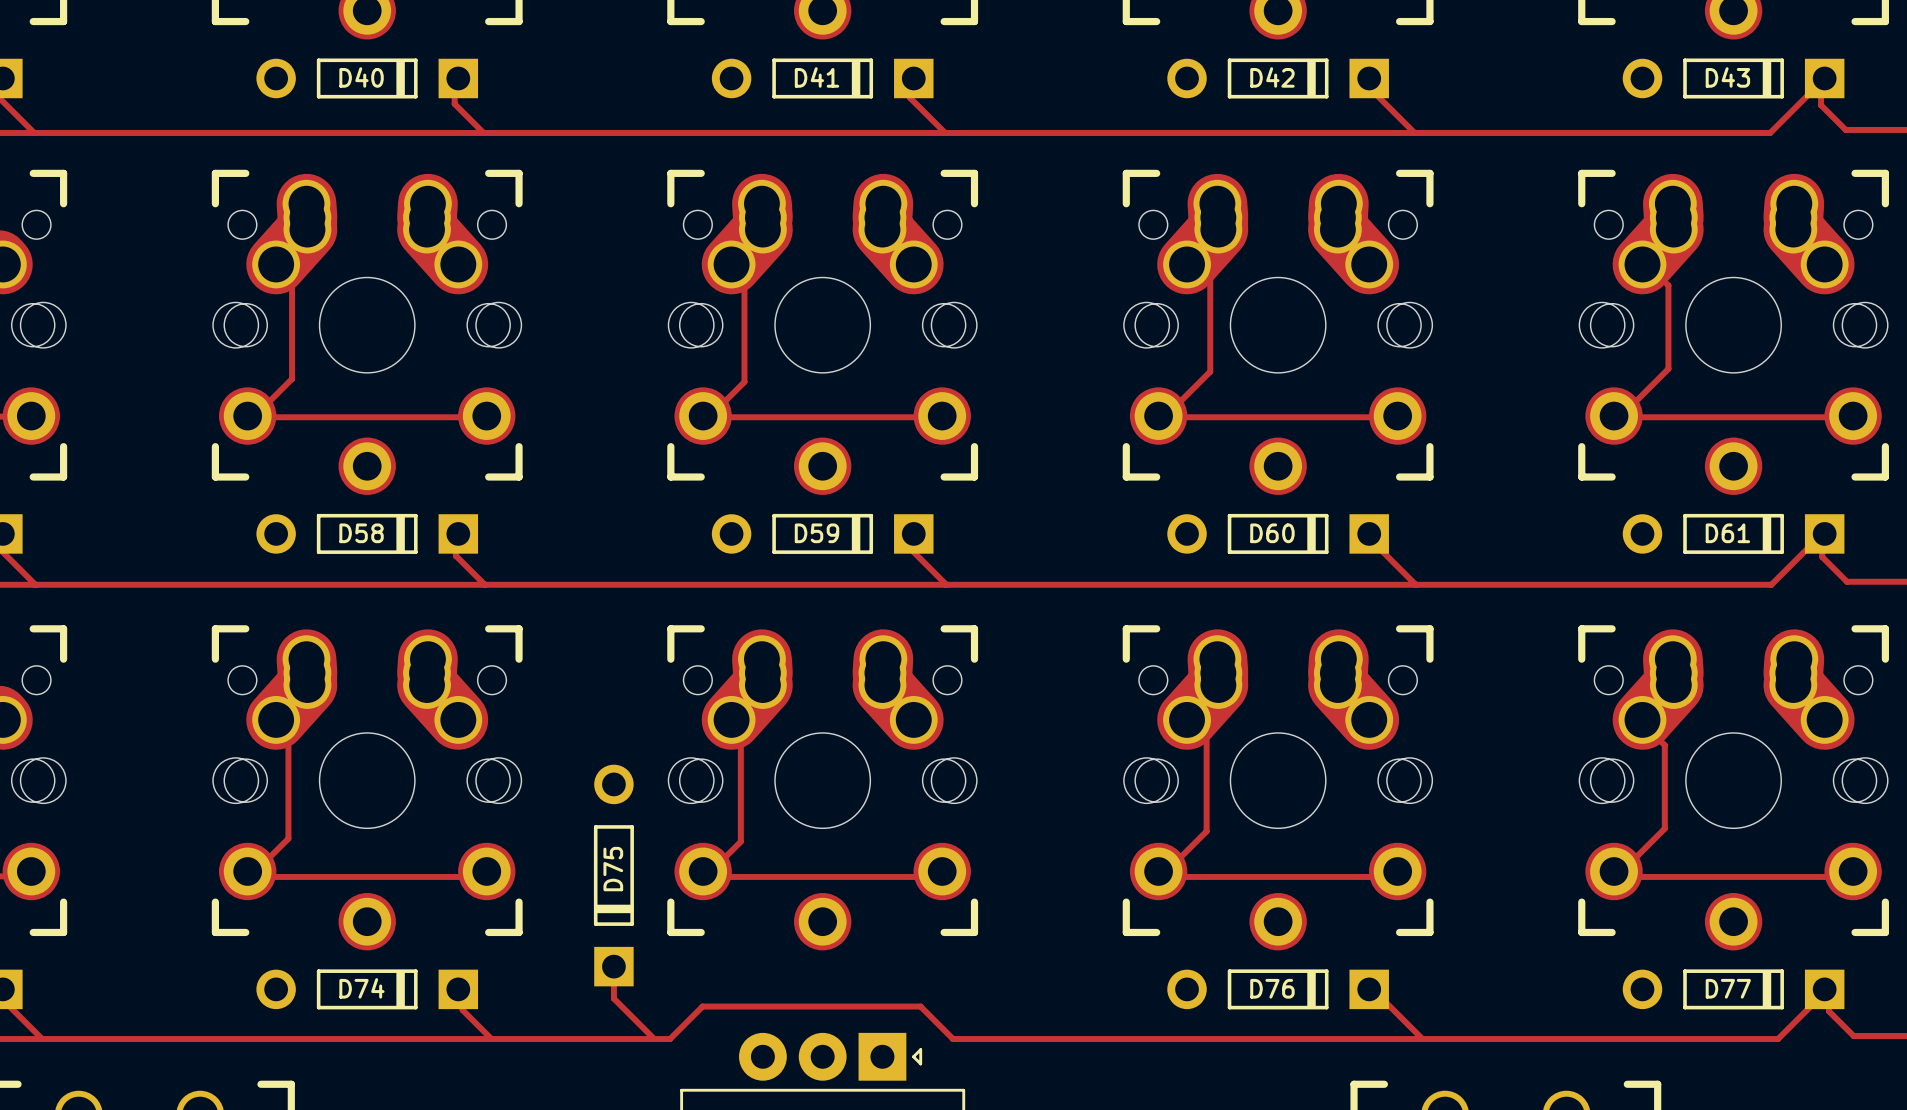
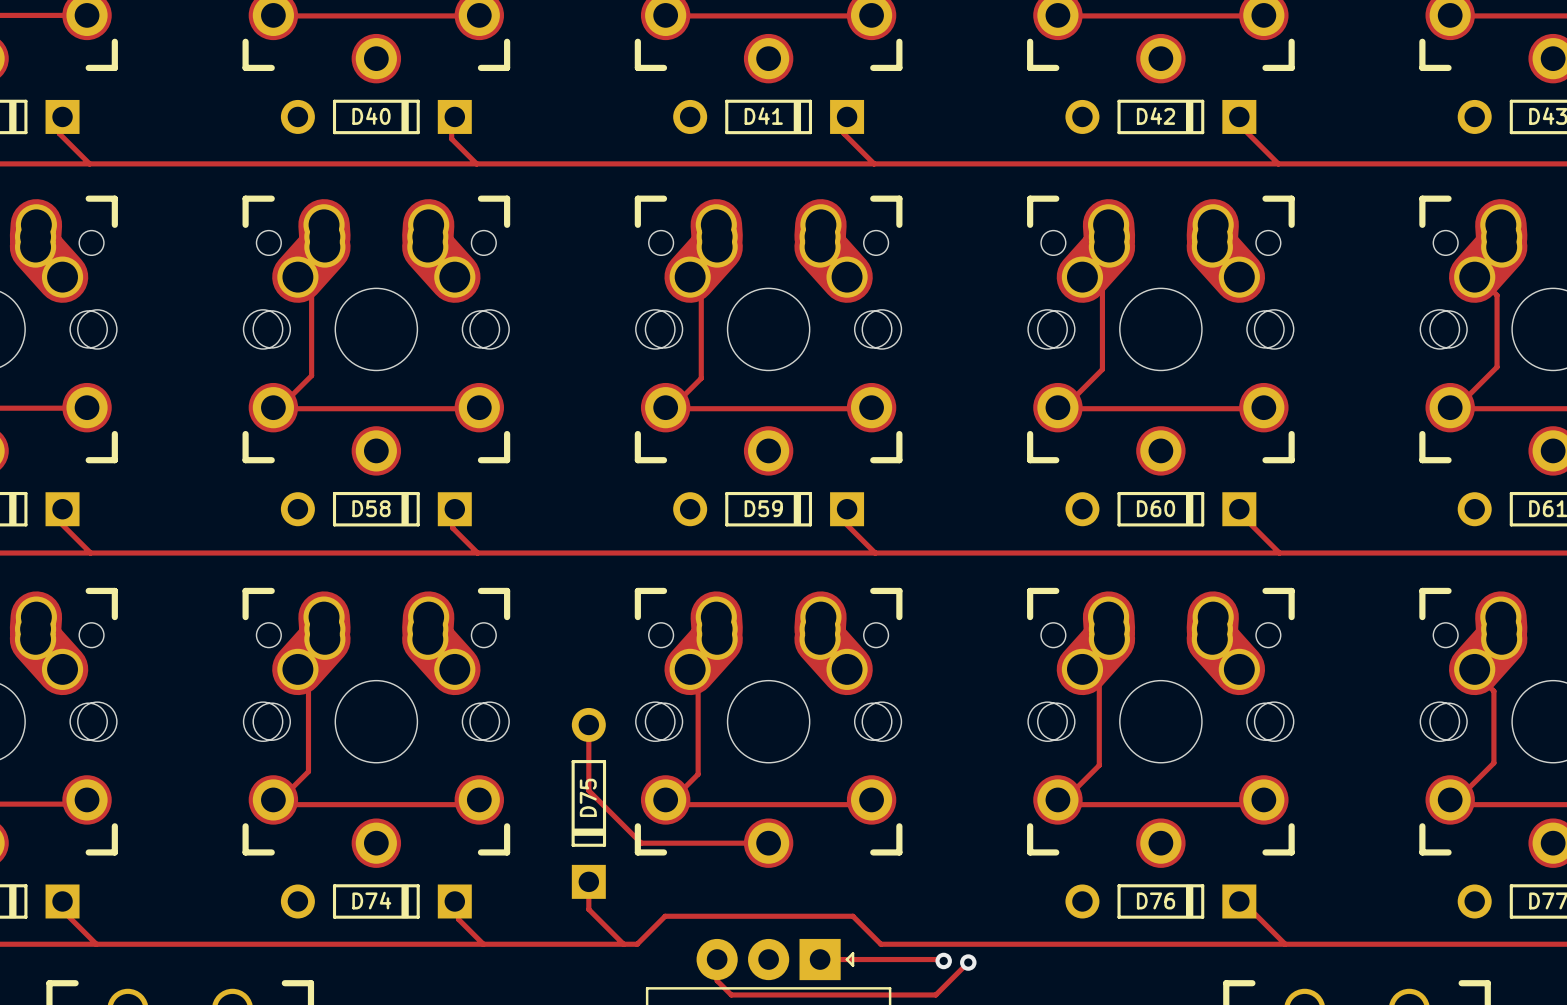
track: none -> (588, 724) (588, 790) (641, 843) (768, 843)
track: none -> (717, 959) (717, 980) (731, 994) (935, 994) (968, 962)
track: none -> (820, 959) (943, 960)
via: none -> (943, 960)
via: none -> (968, 962)

